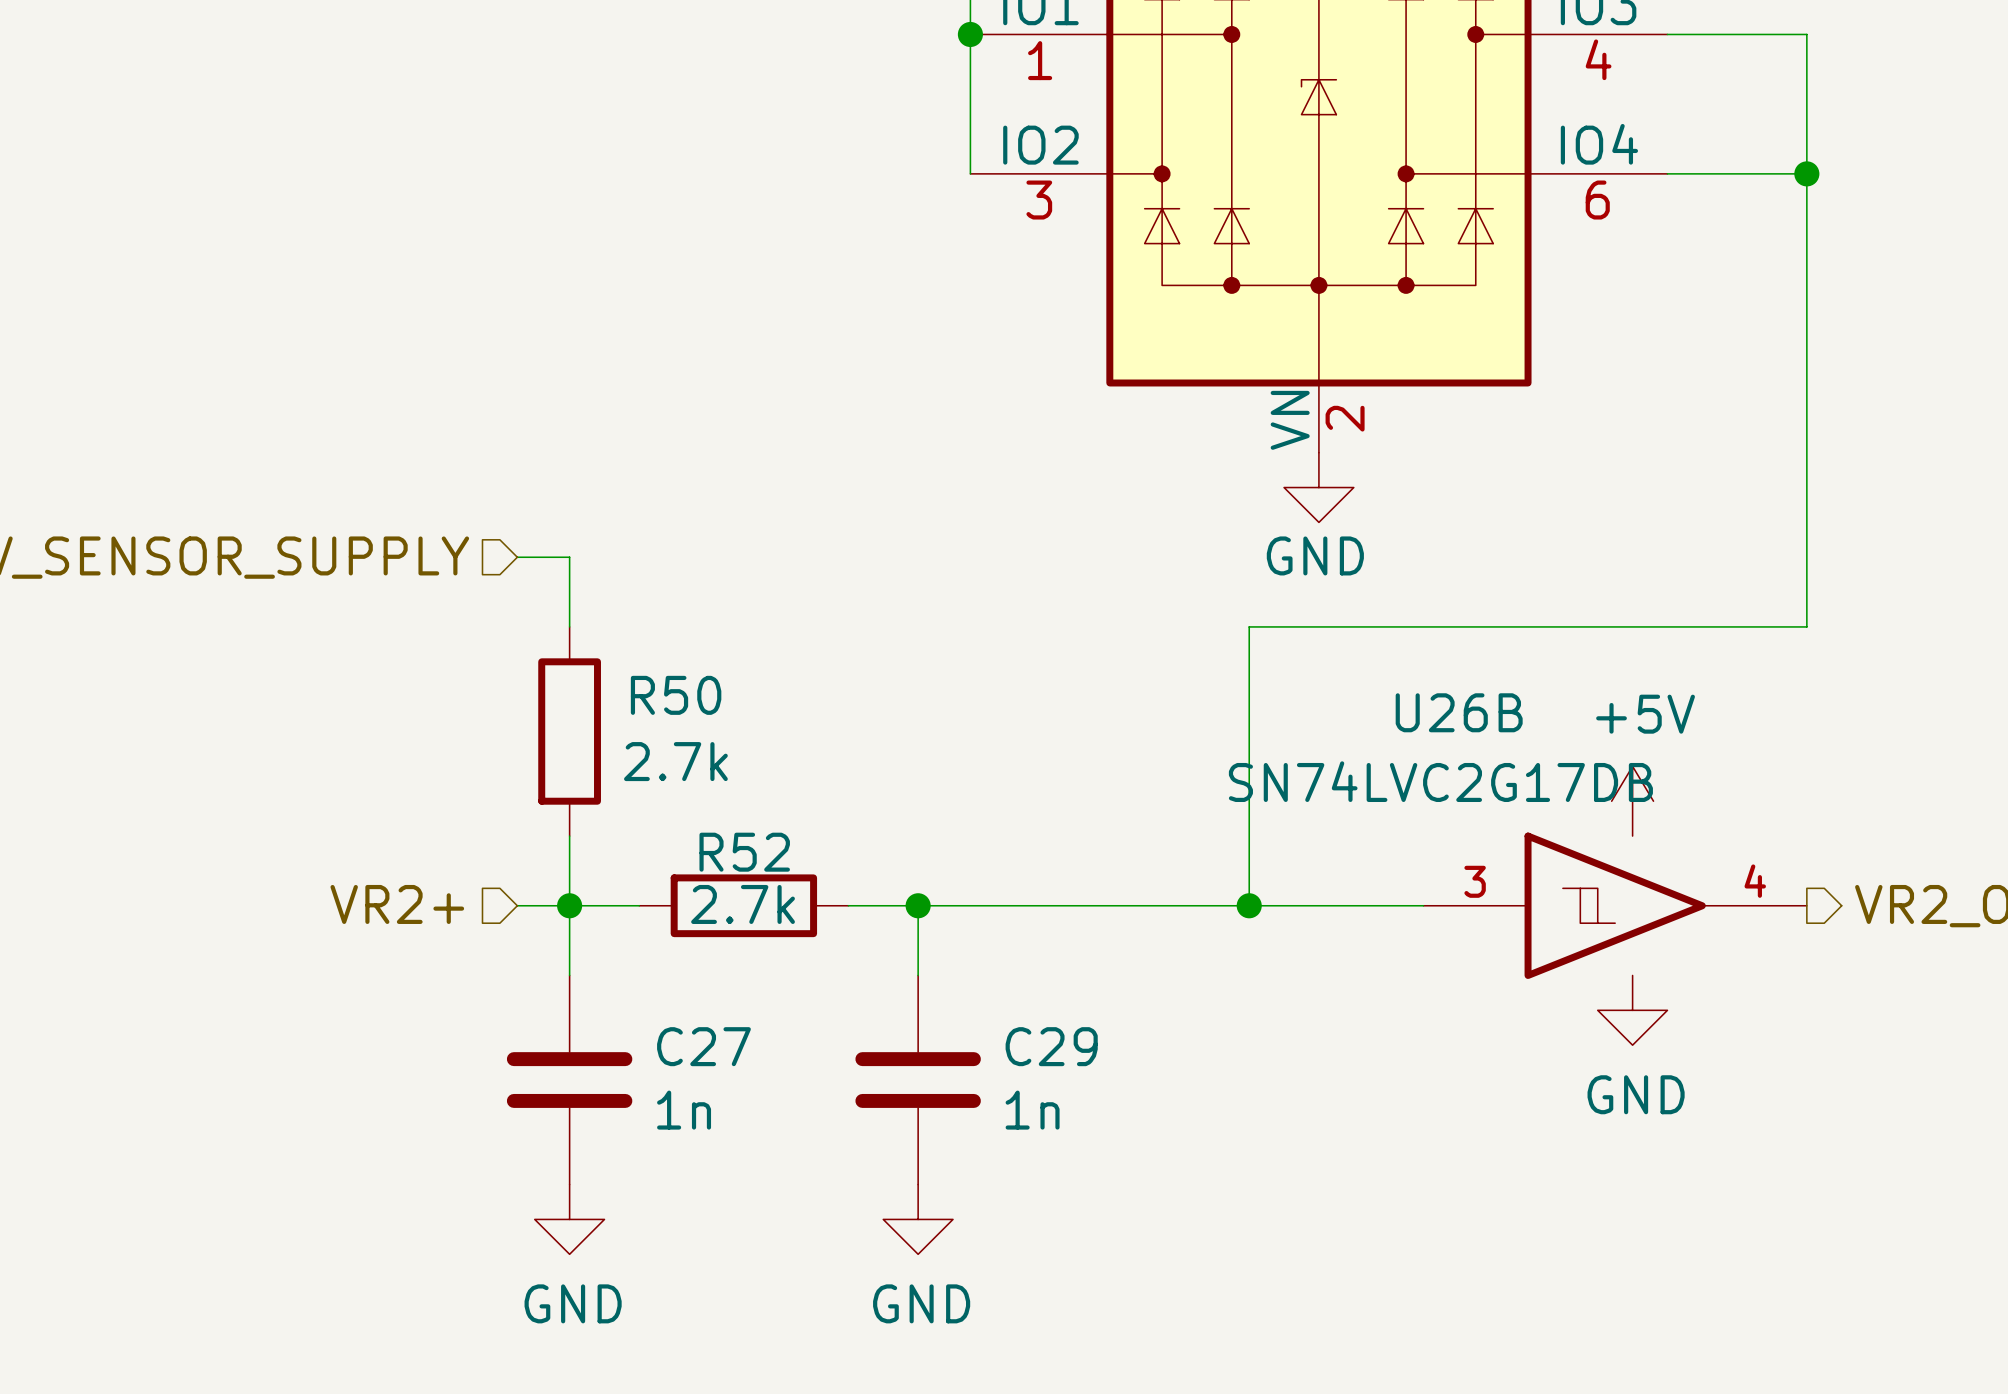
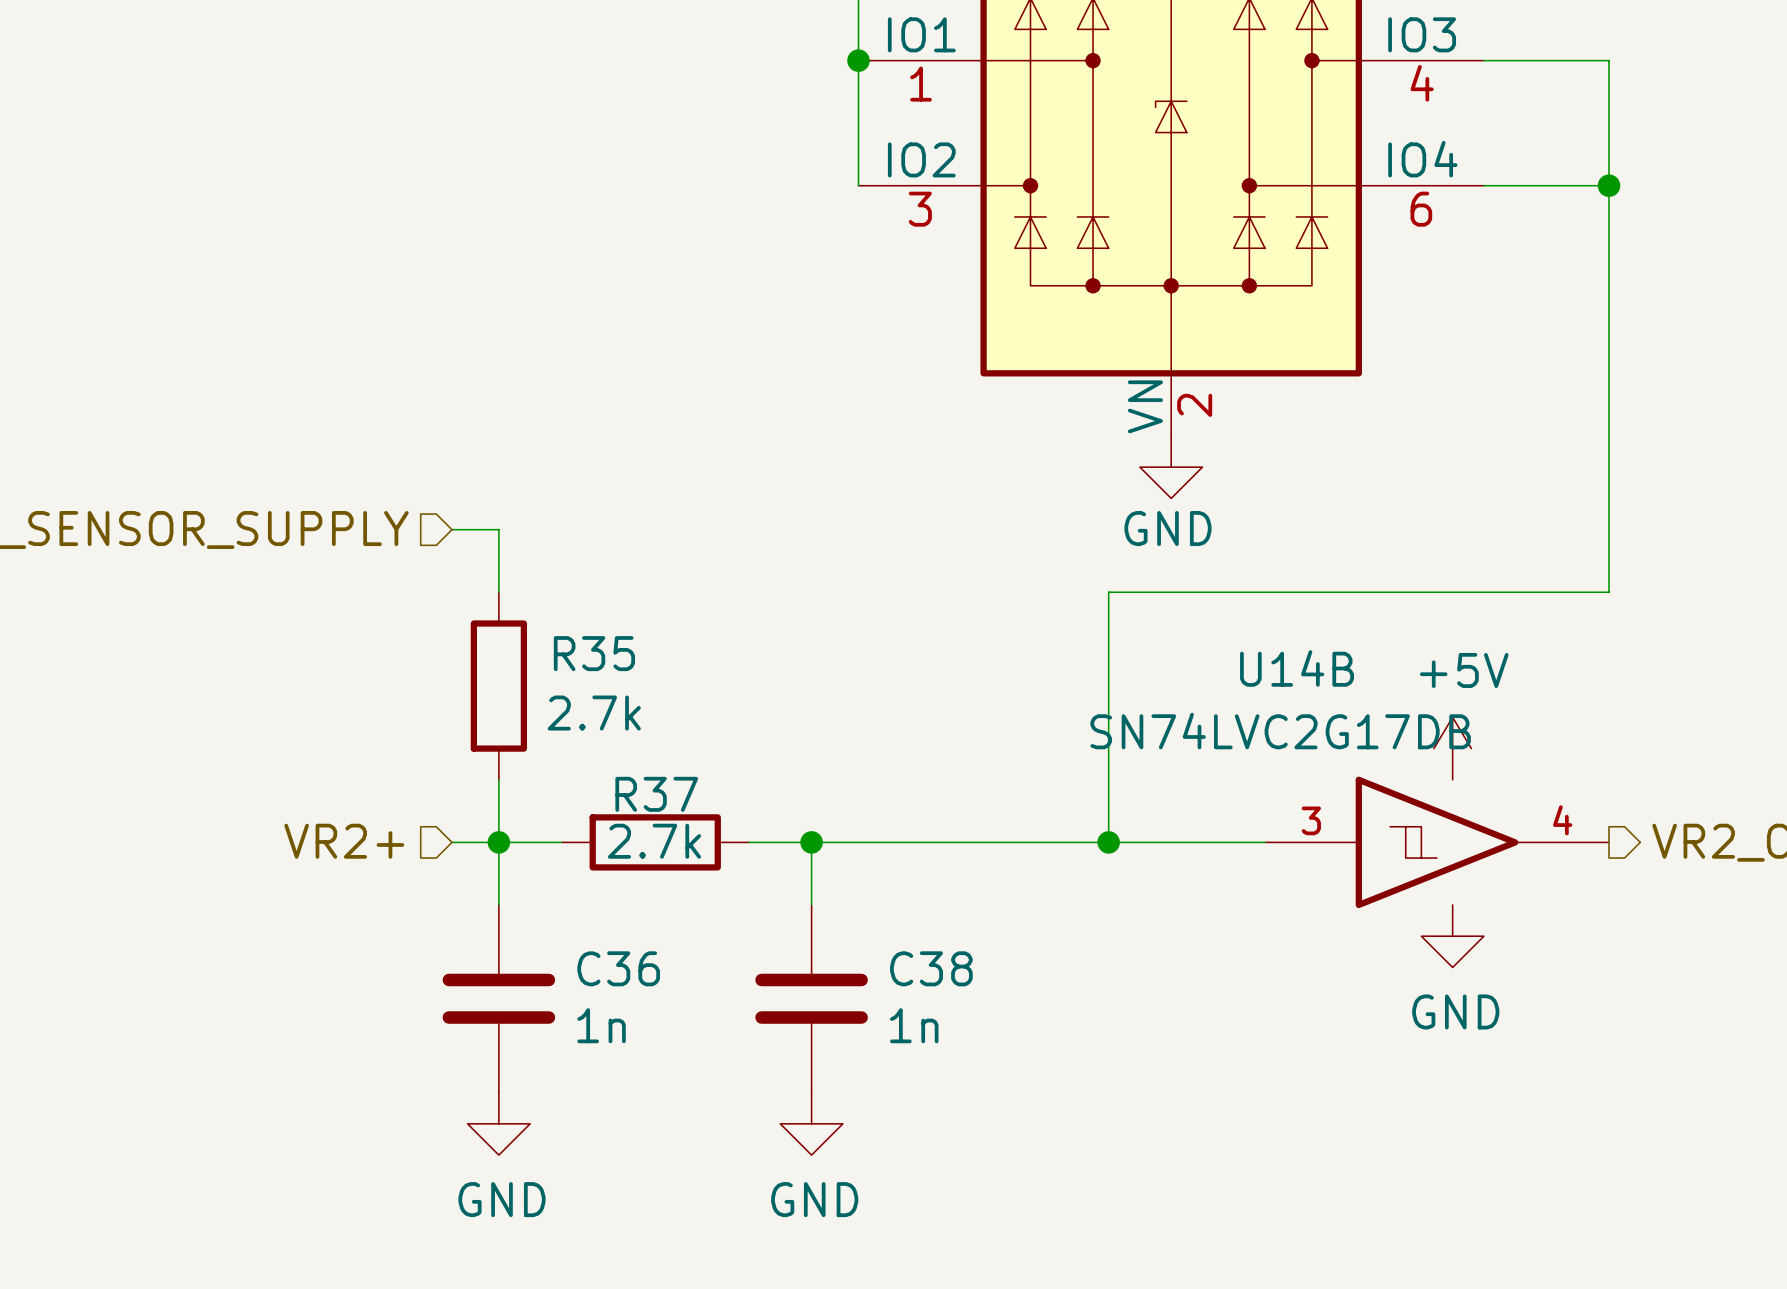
R50 name: R50 (676, 695) -> R35 (594, 653)
U26B name: U26B (1459, 712) -> U14B (1297, 668)
R52 name: R52 (744, 852) -> R37 (656, 794)
C27 name: C27 (703, 1046) -> C36 (618, 968)
C29 name: C29 (1051, 1046) -> C38 (931, 968)

